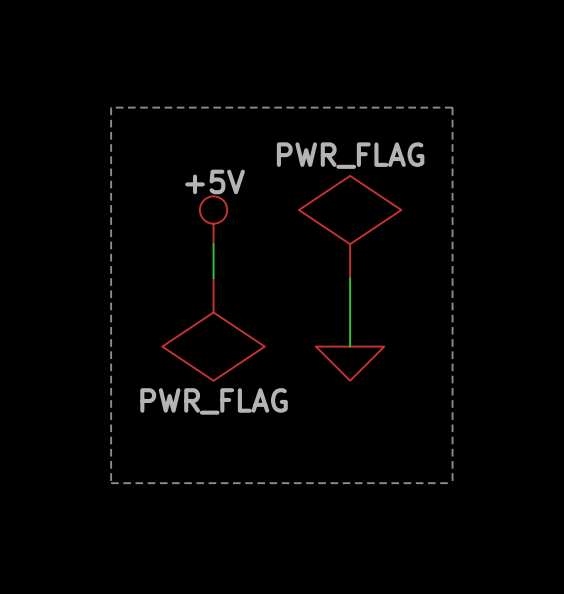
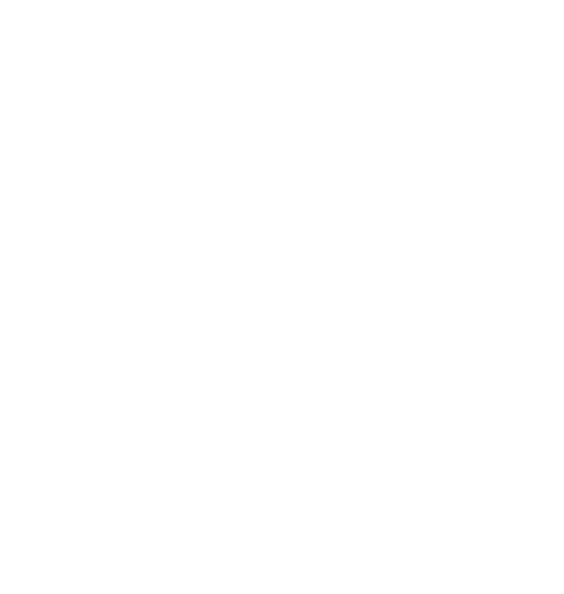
line: (111, 107) (452, 107) (452, 483) (111, 483) (111, 107) -> none
power symbol: +5V (213, 220) -> none
power symbol: PWR_FLAG (350, 227) -> none
wire: (213, 244) (213, 278) -> none
wire: (350, 278) (350, 346) -> none
power symbol: PWR_FLAG (213, 329) -> none
power symbol: (350, 363) -> none

